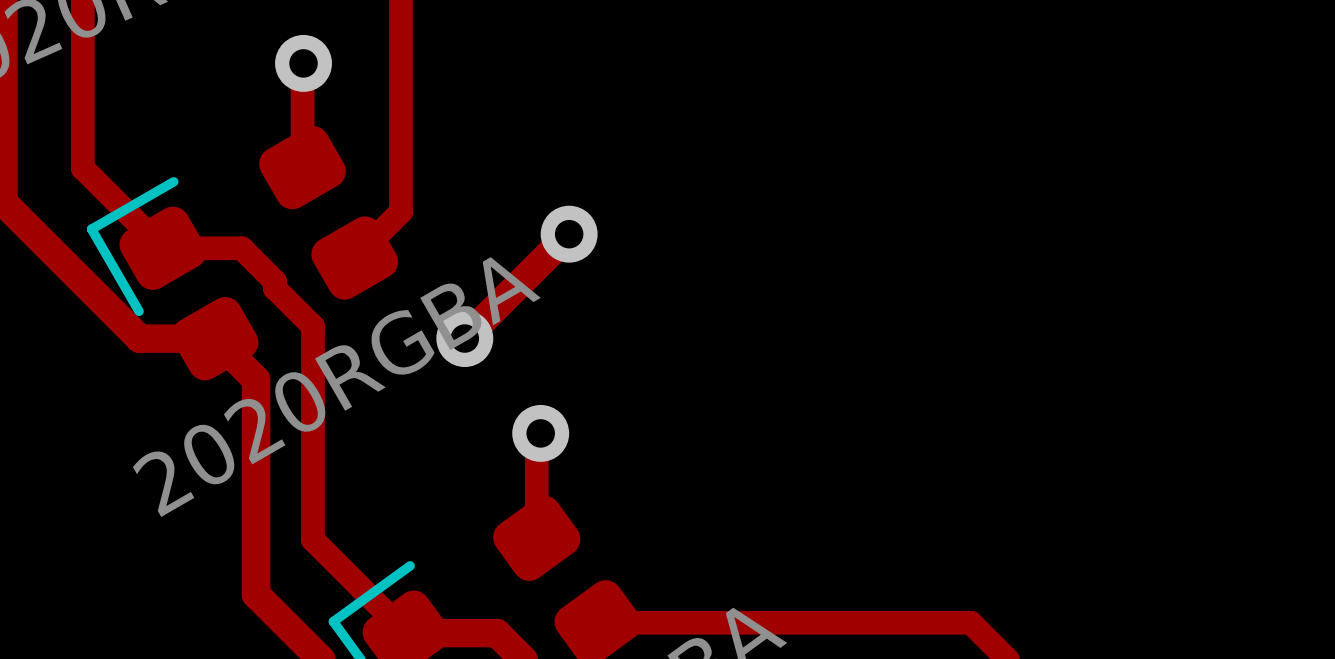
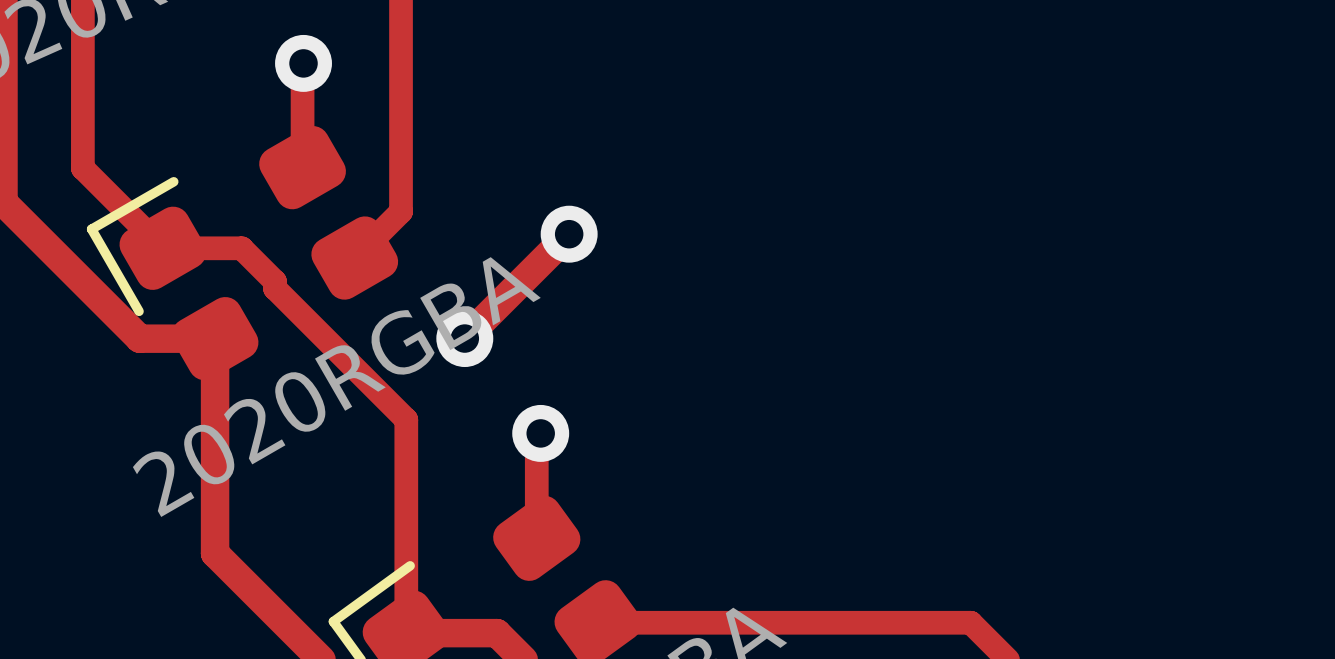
track: (313, 326) (313, 539) (406, 633) -> (313, 326) (406, 419) (406, 633)
track: (215, 338) (256, 379) (256, 594) -> (215, 338) (215, 553) (256, 594)

